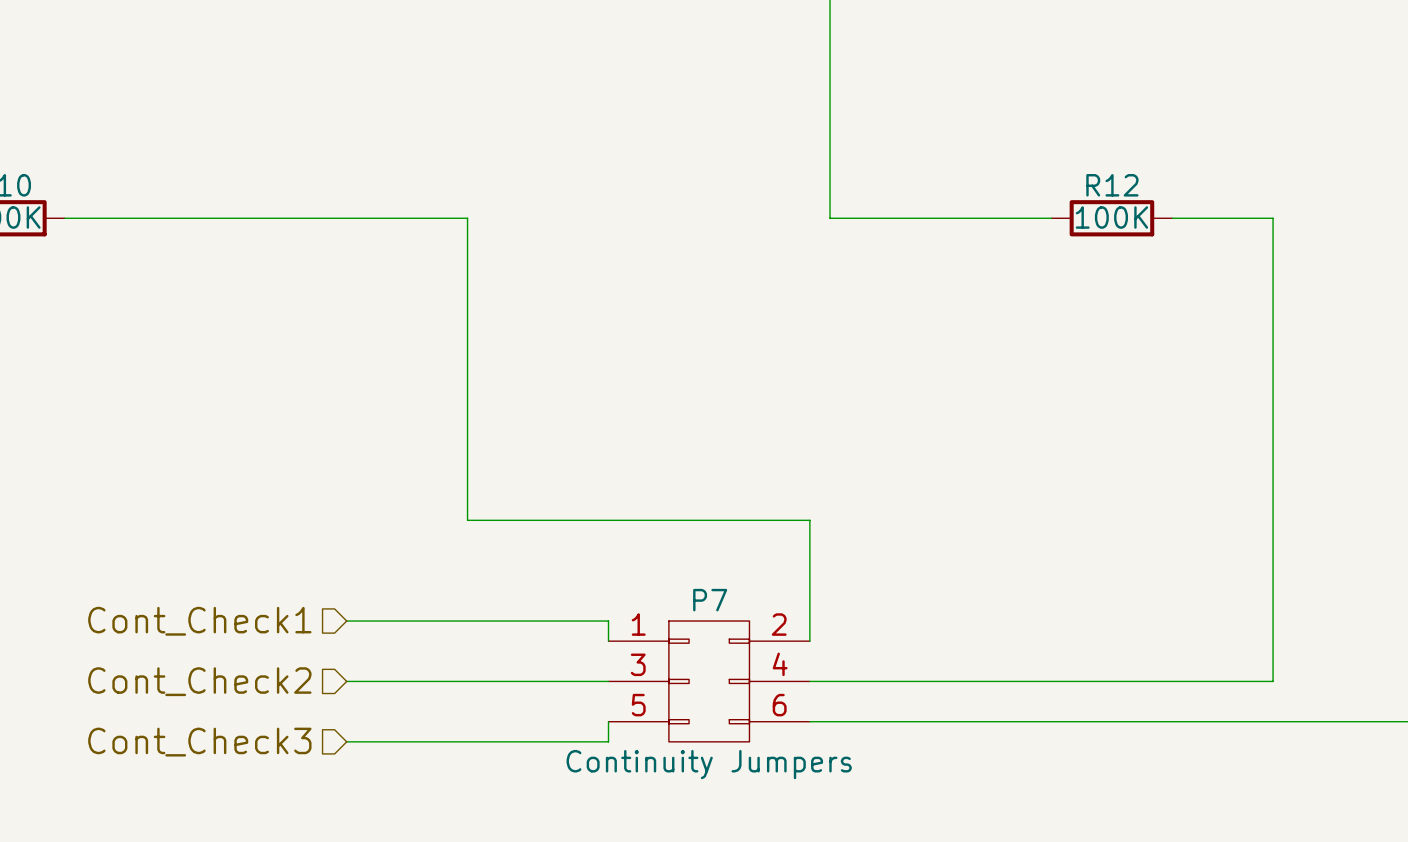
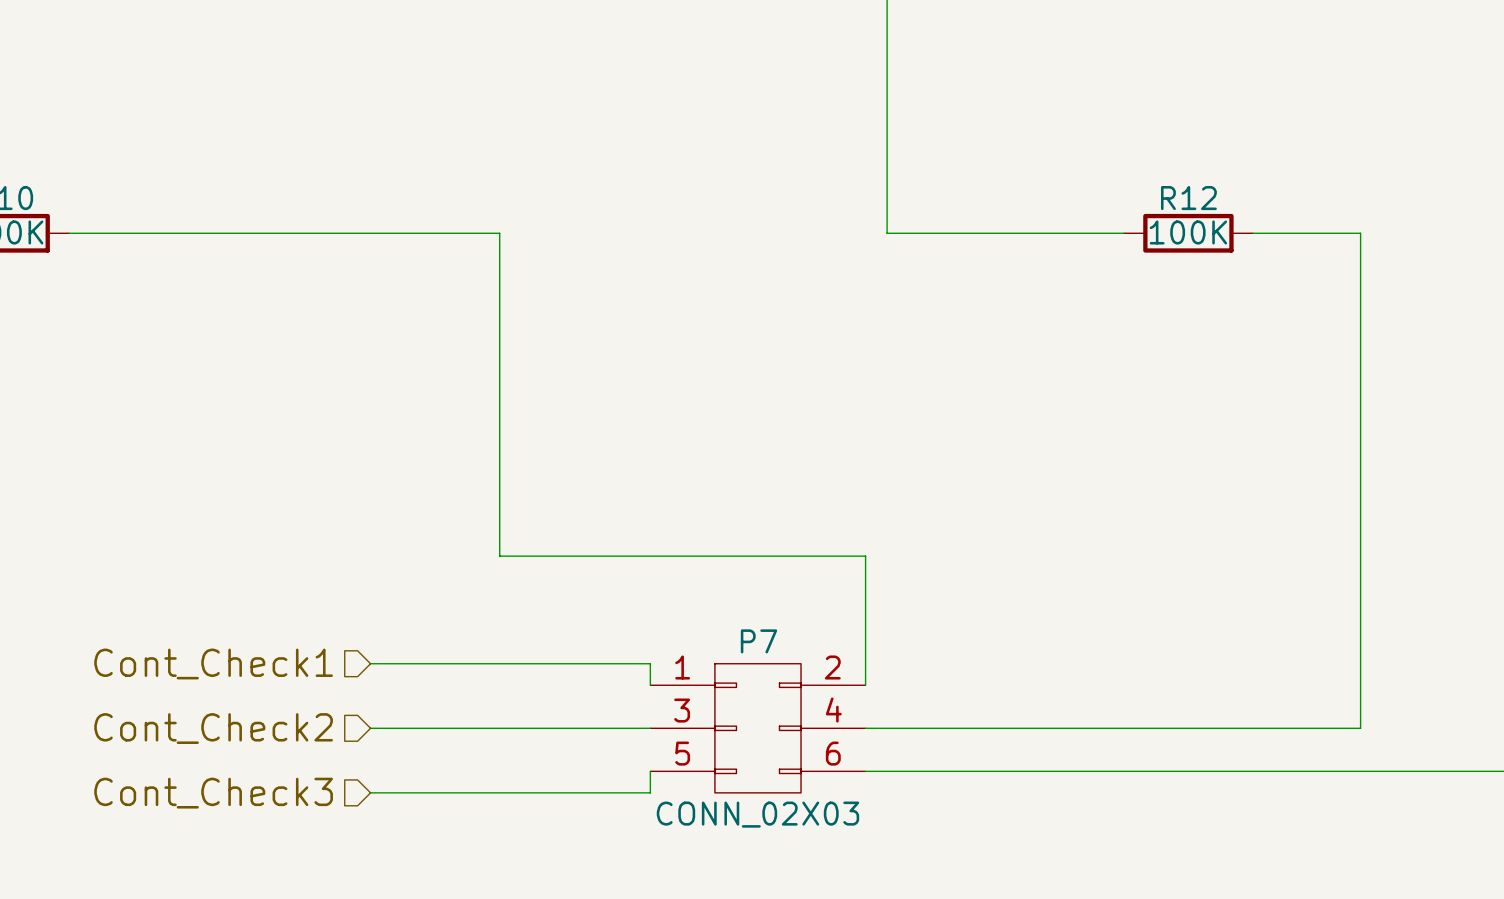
P7 value: Continuity Jumpers (709, 764) -> CONN_02X03 (757, 814)

